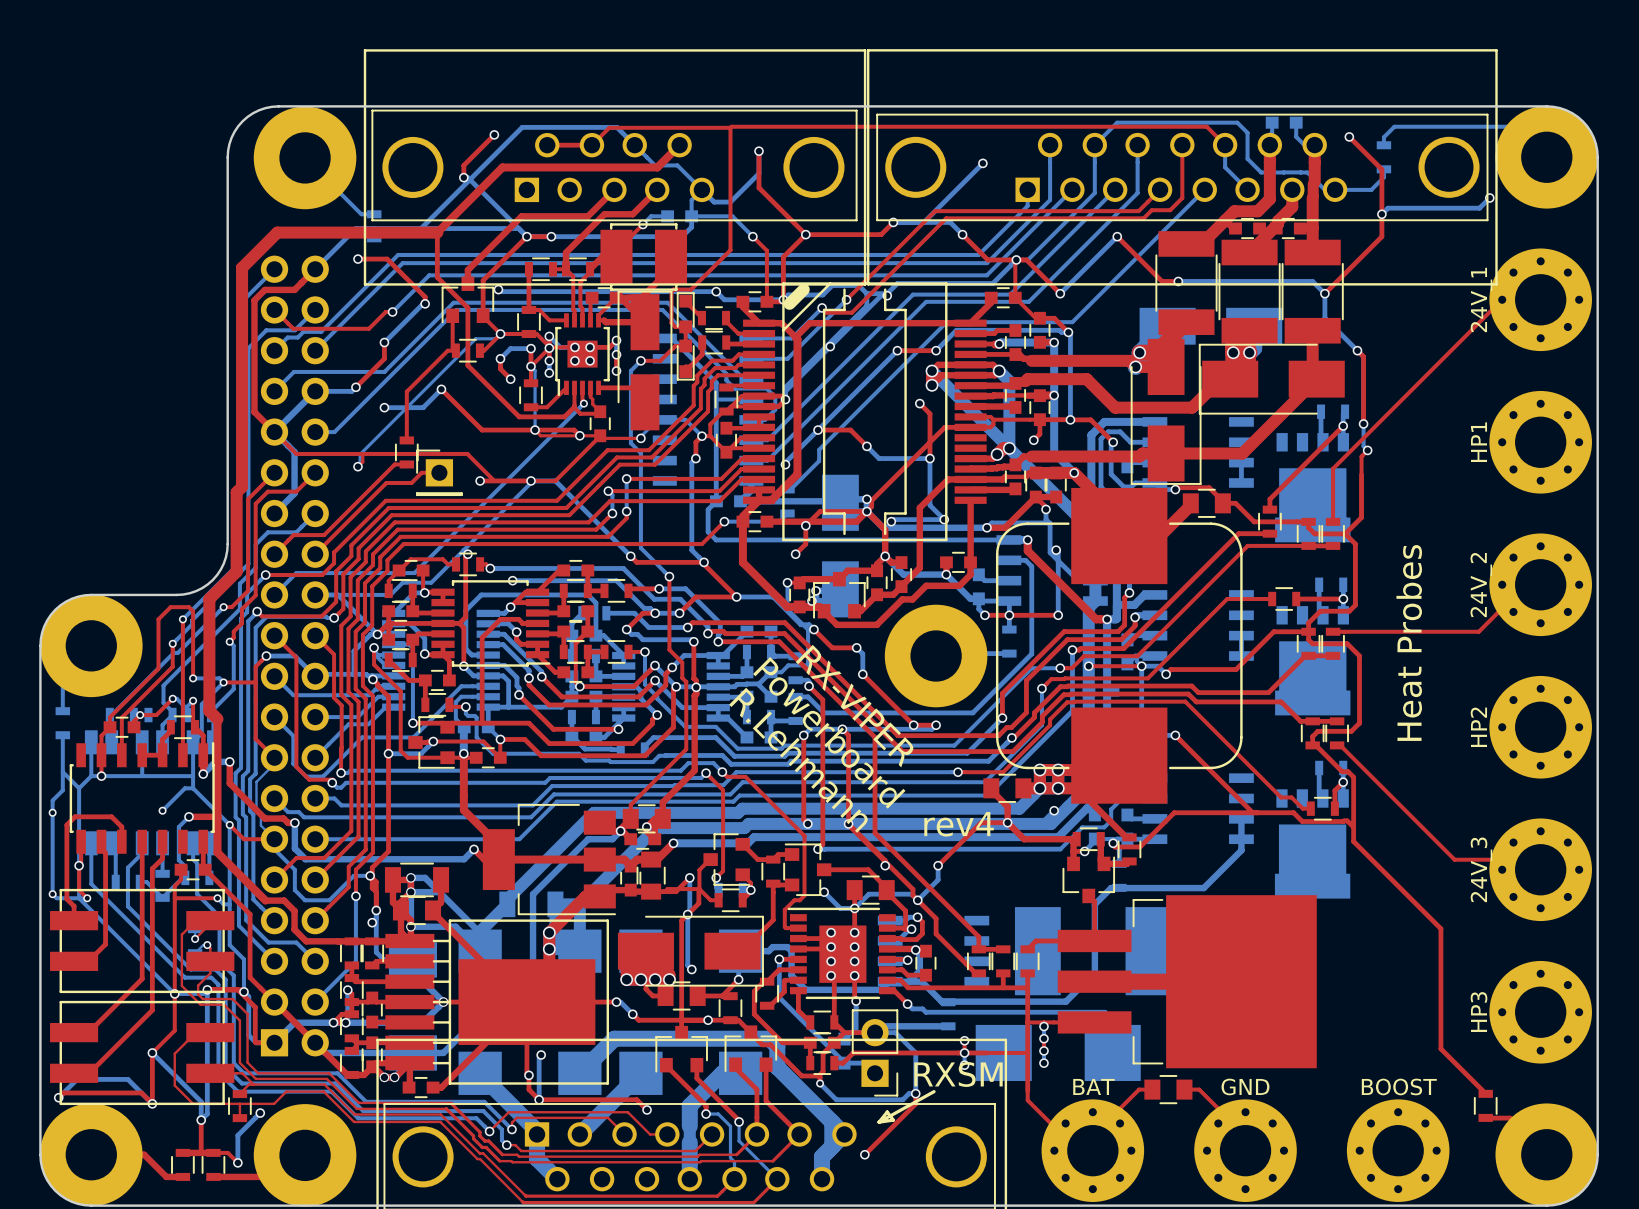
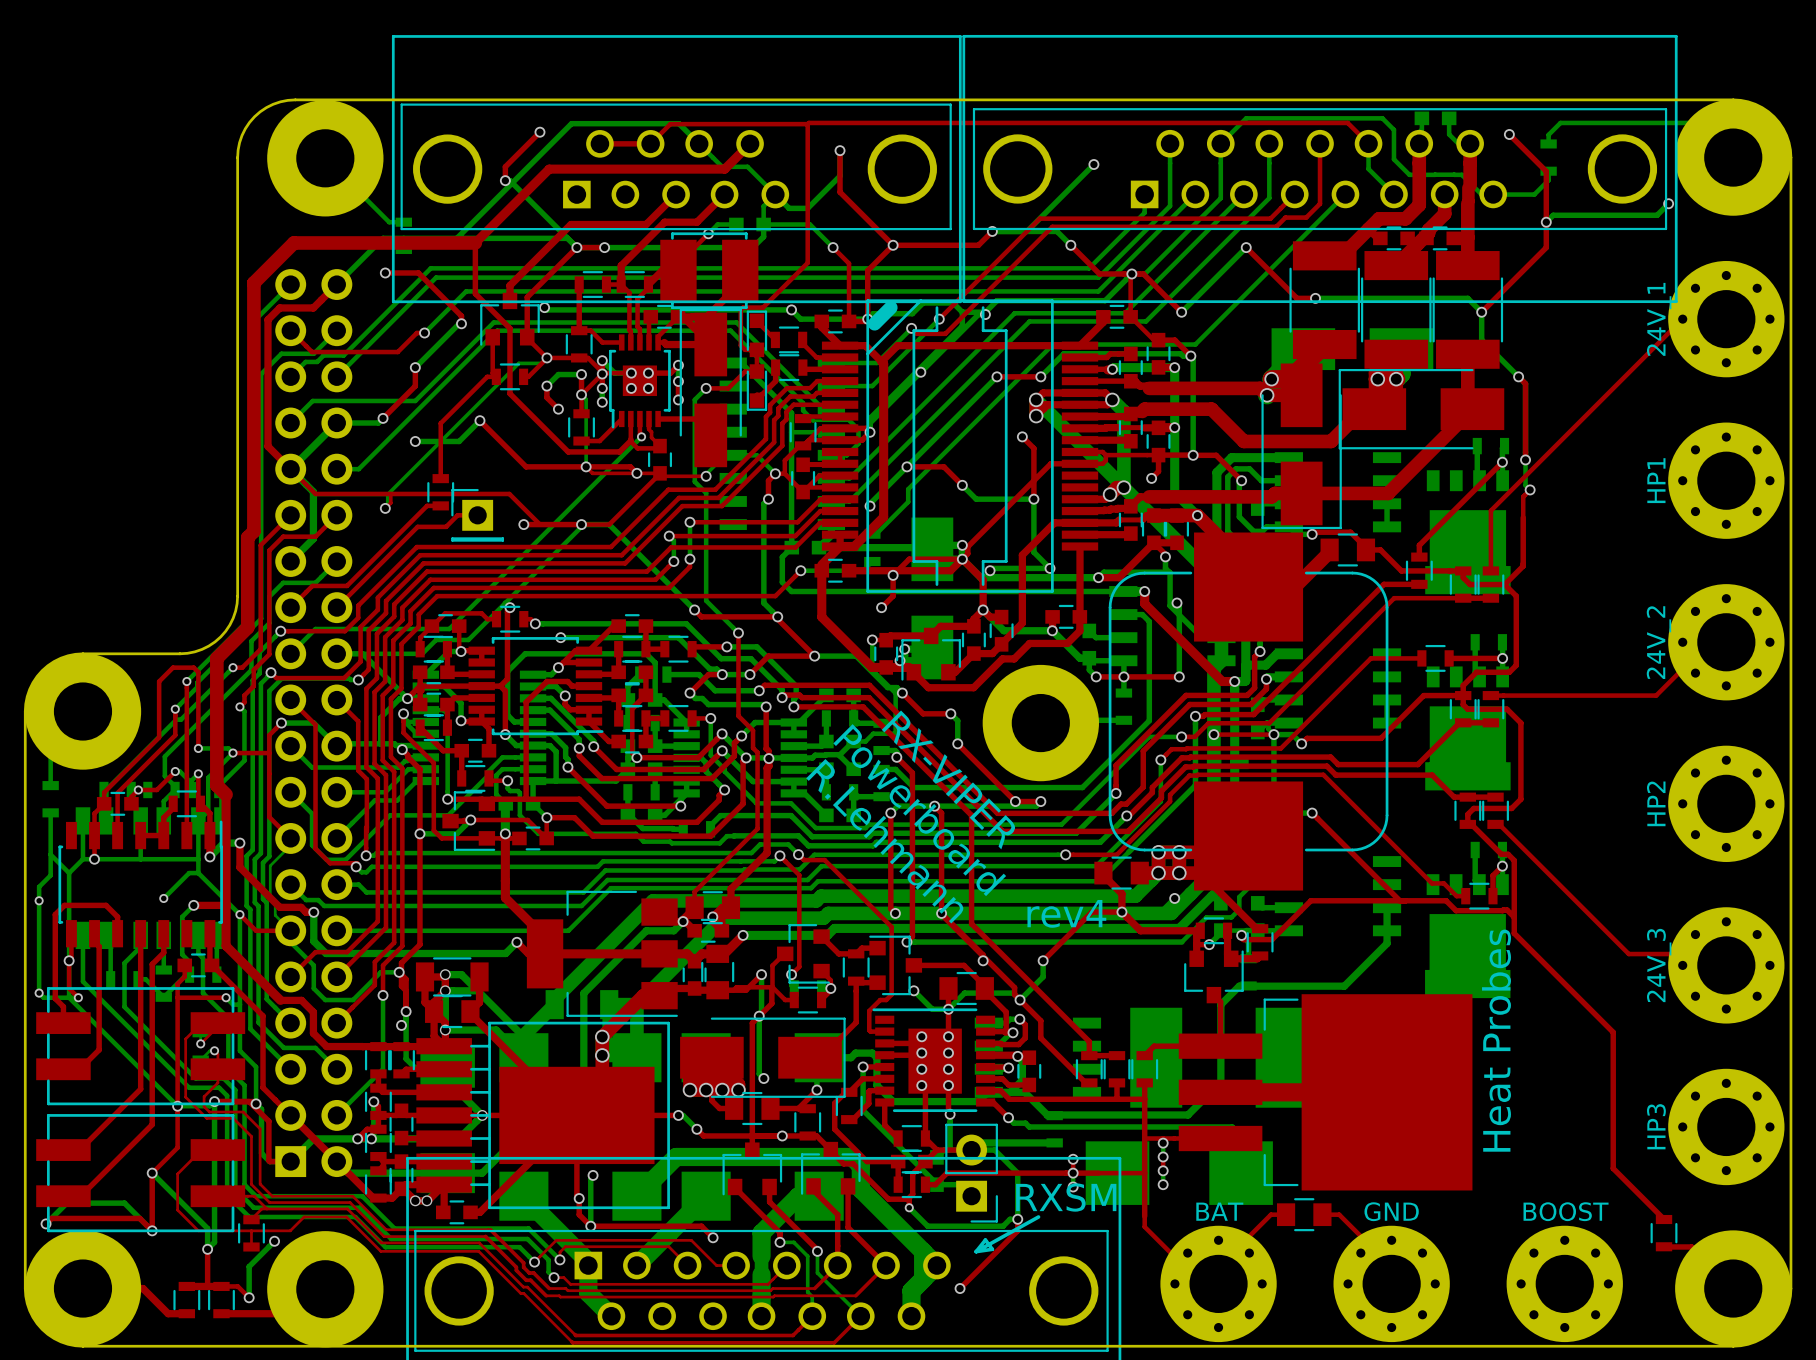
text position: Heat Probes (1409, 642) -> Heat Probes (1496, 1040)

